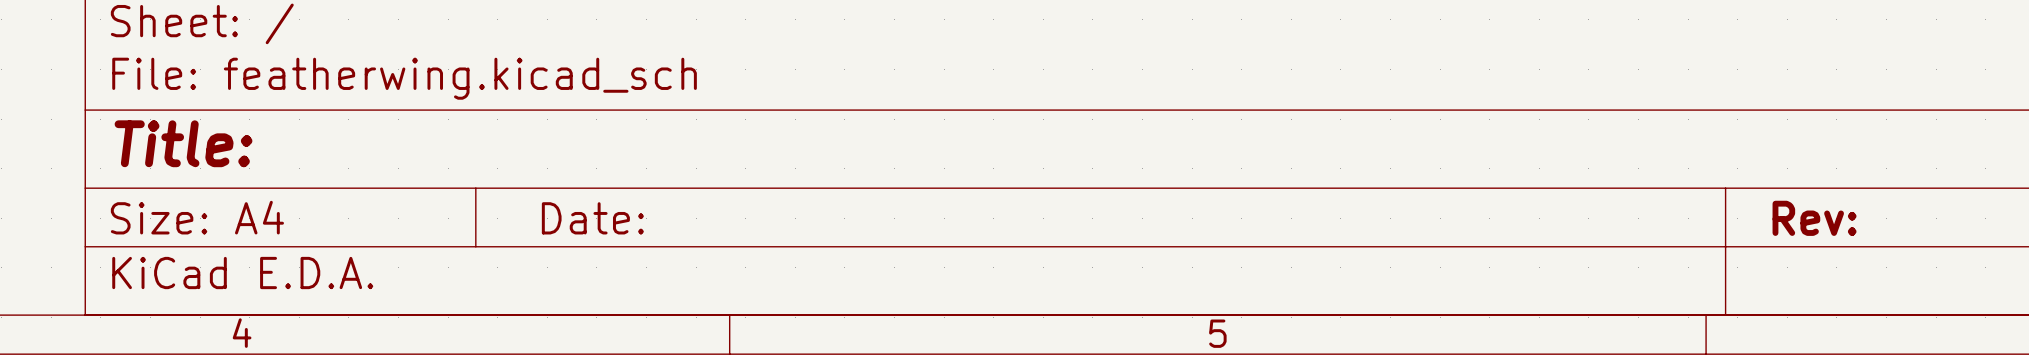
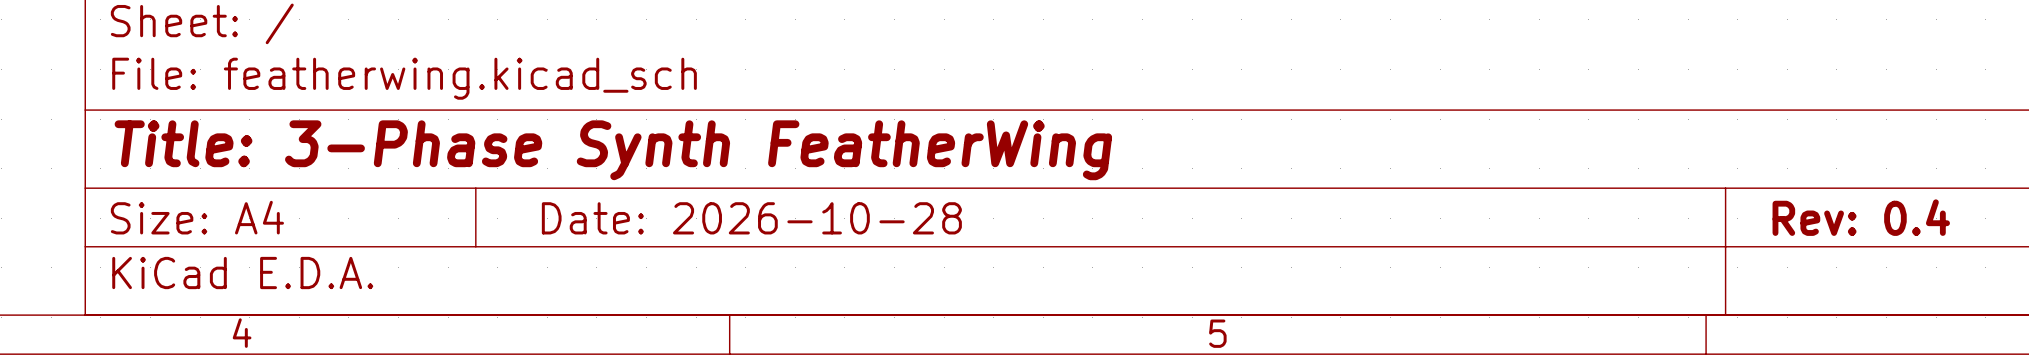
title block: Title: (183, 143) -> Title: 3-Phase Synth FeatherWing (613, 150)
title block: Date: (592, 218) -> Date: 2026-10-28 (751, 218)
title block: Rev: (1814, 218) -> Rev: 0.4 (1861, 217)

